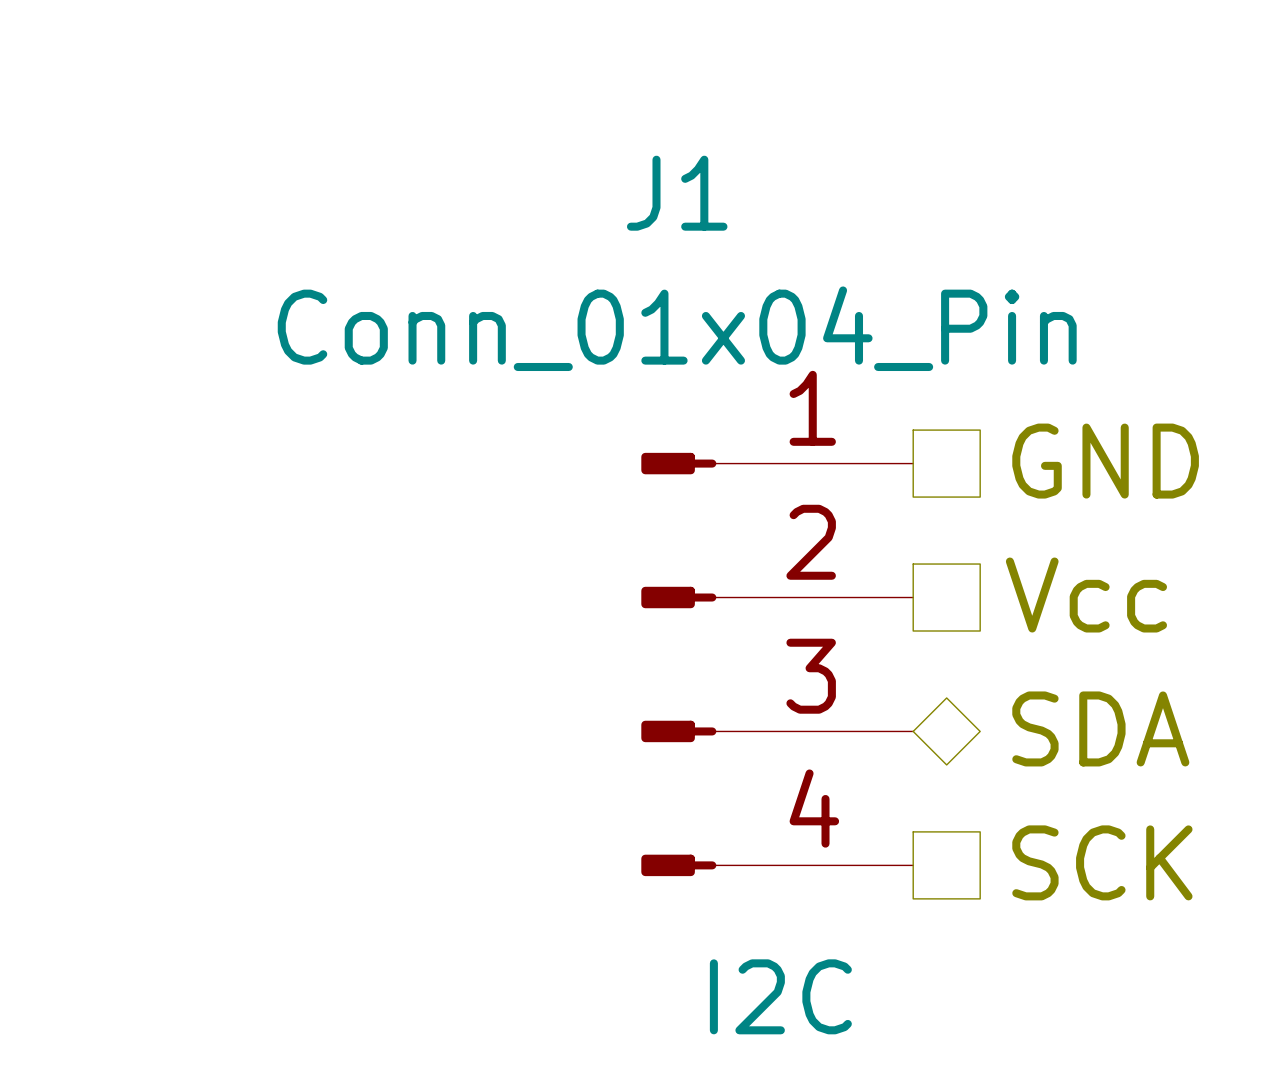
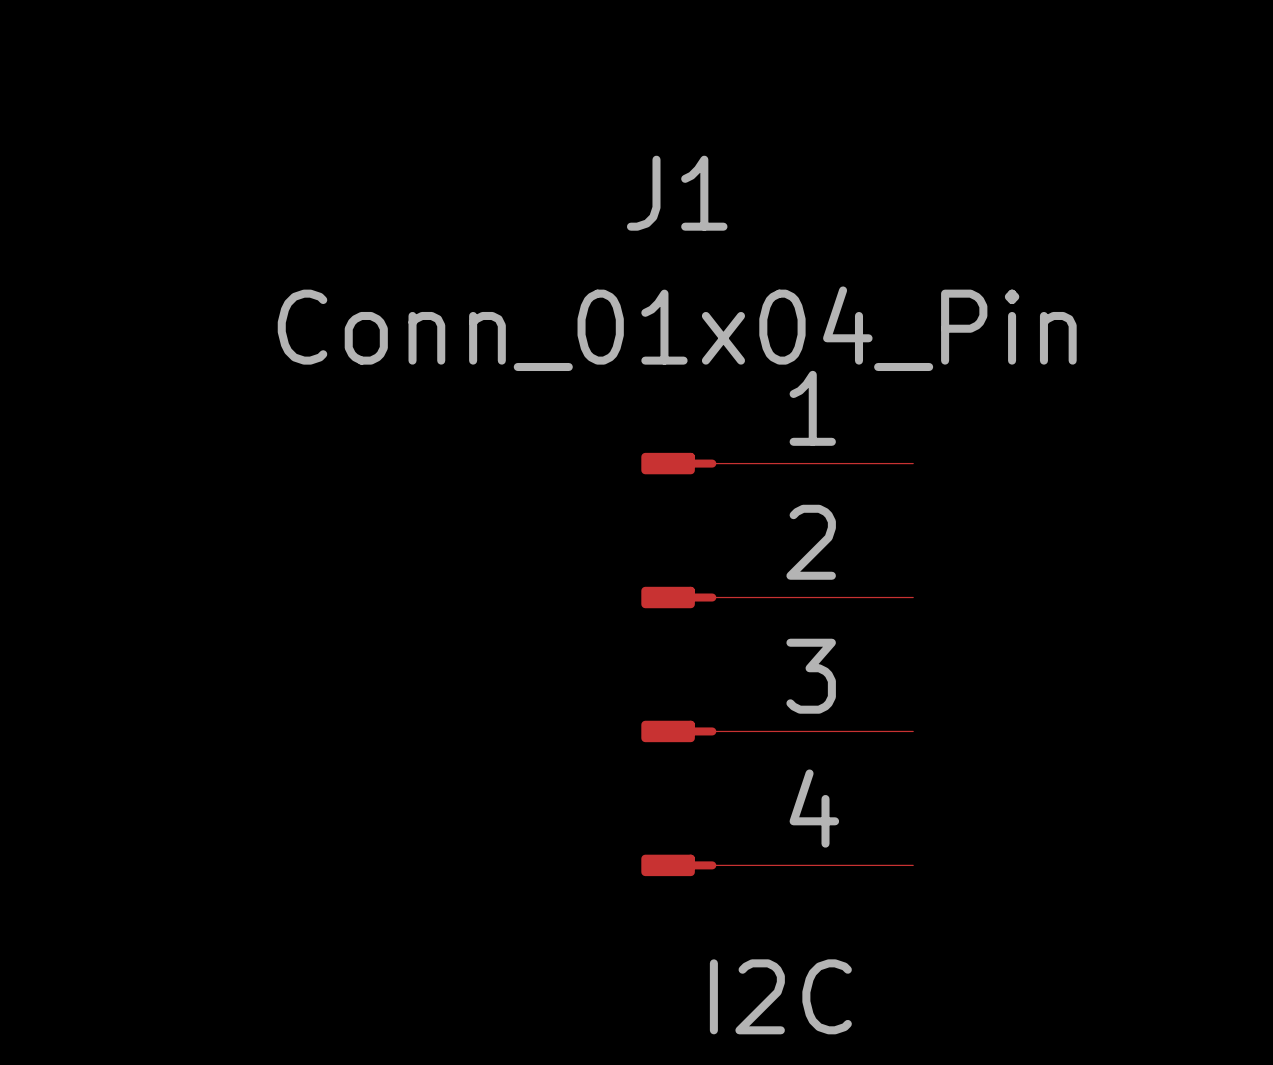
hierarchical label: GND (1105, 461) -> none
hierarchical label: Vcc (1086, 595) -> none
hierarchical label: SDA (1100, 728) -> none
hierarchical label: SCK (1102, 862) -> none

